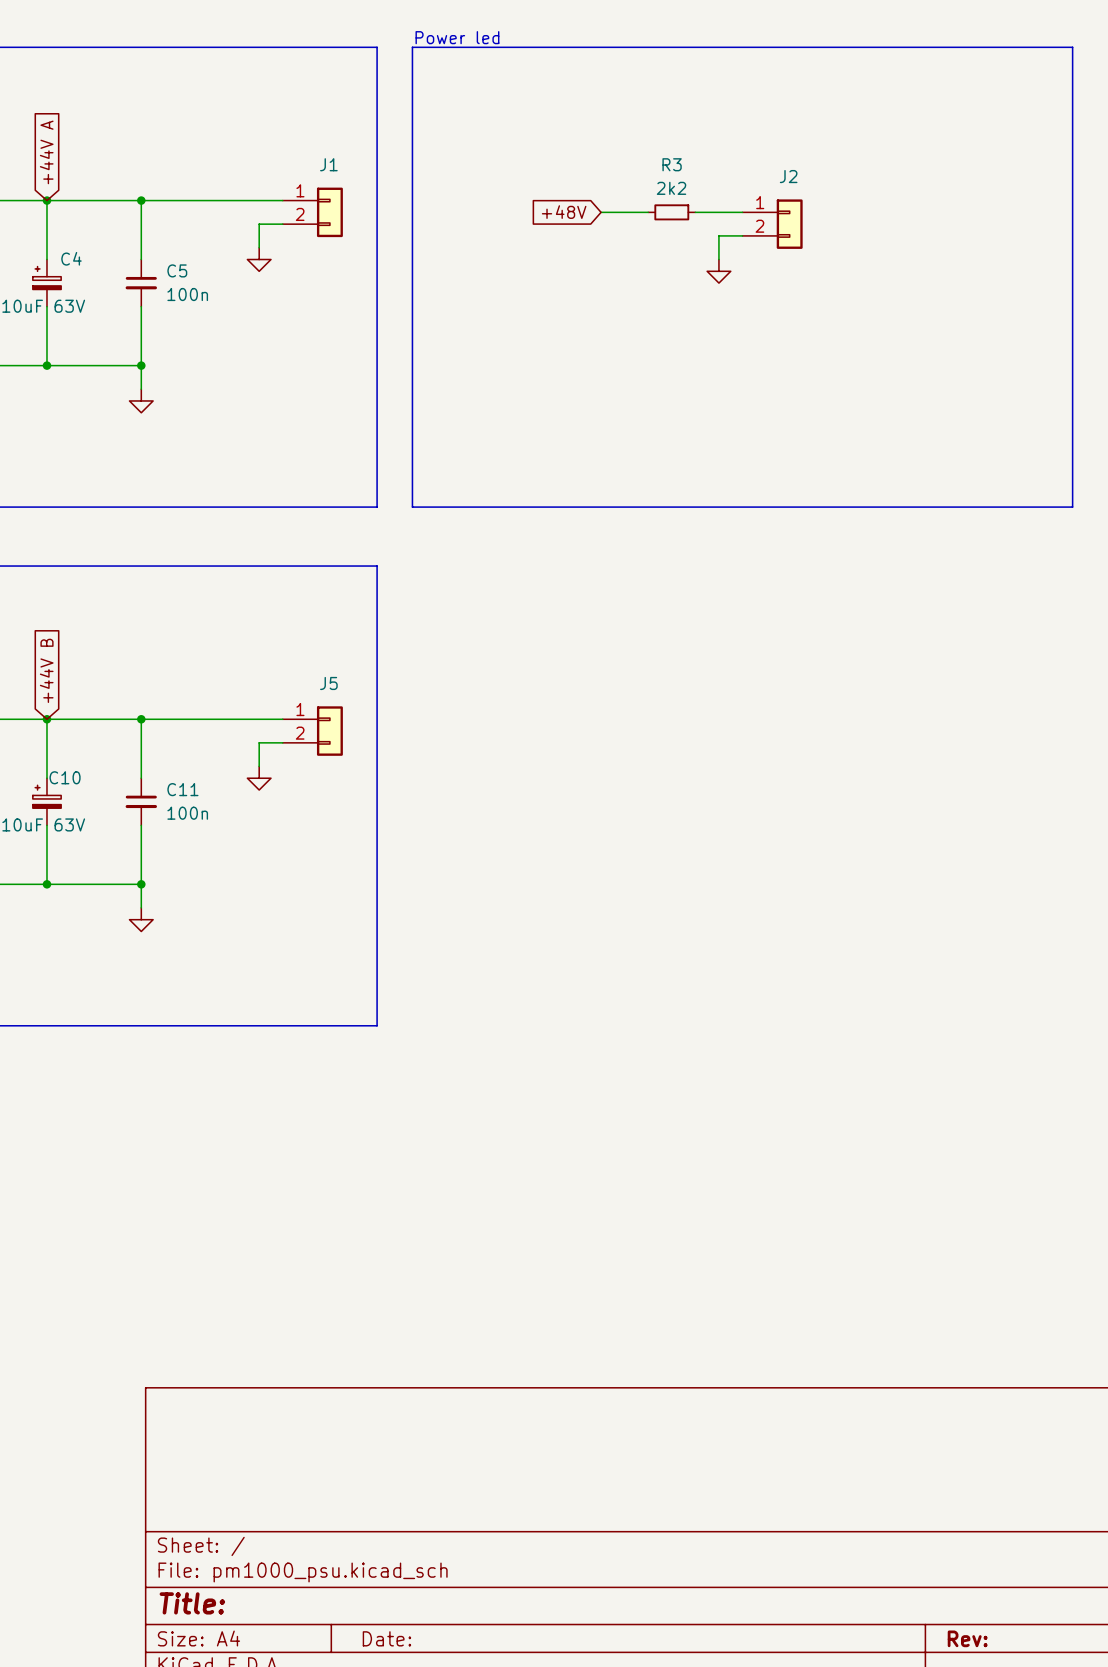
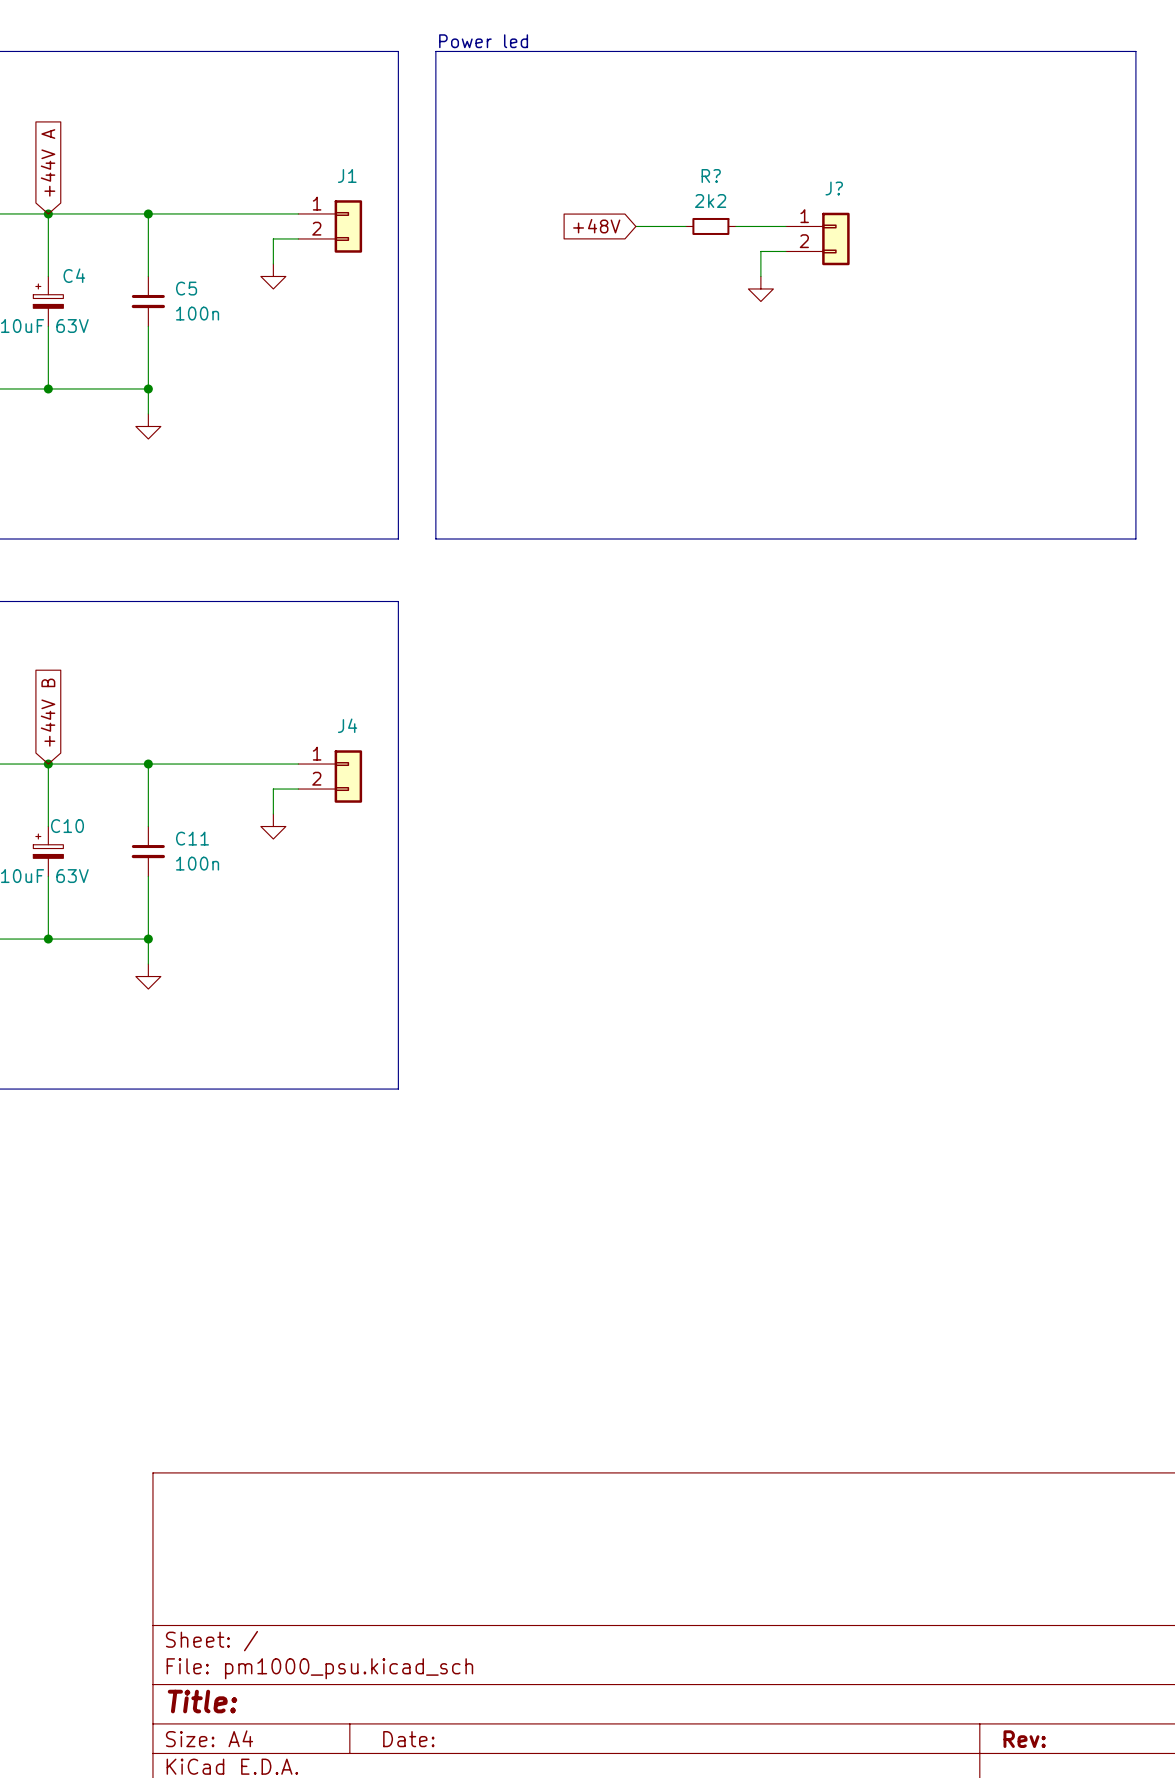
R3 name: R3 (672, 164) -> R? (711, 176)
J2 name: J2 (788, 176) -> J? (834, 188)
J5 name: J5 (328, 683) -> J4 (347, 725)

